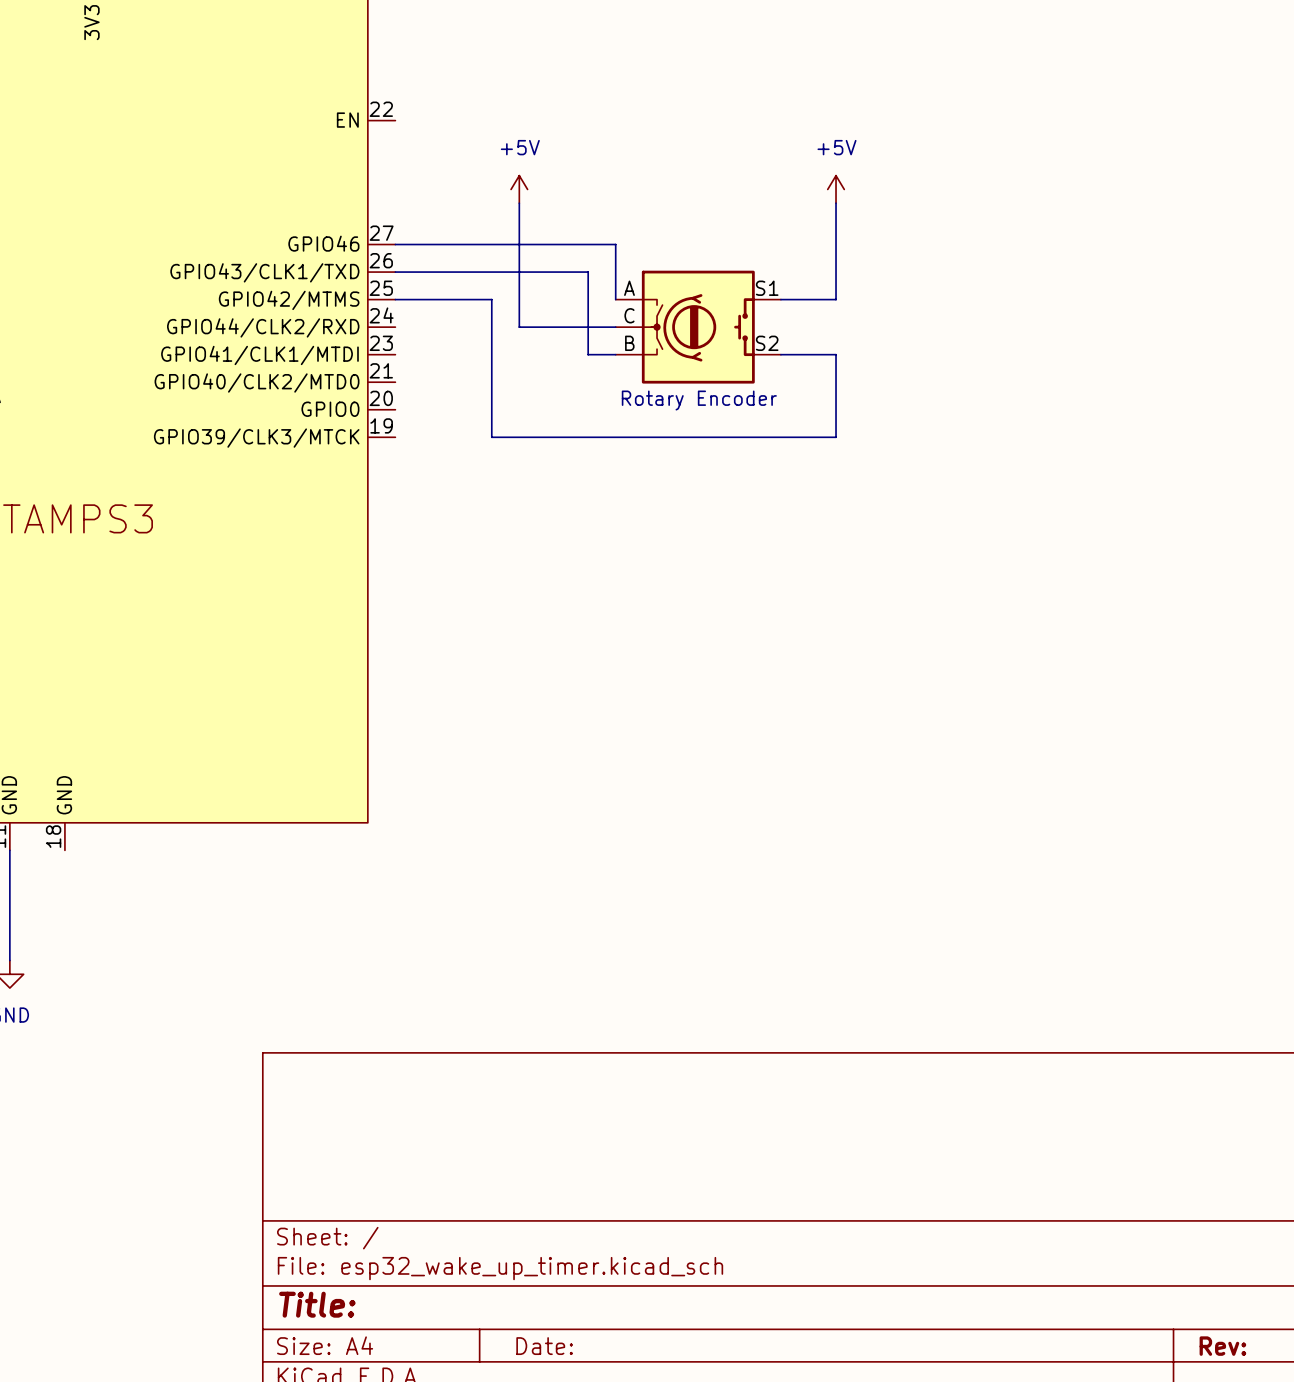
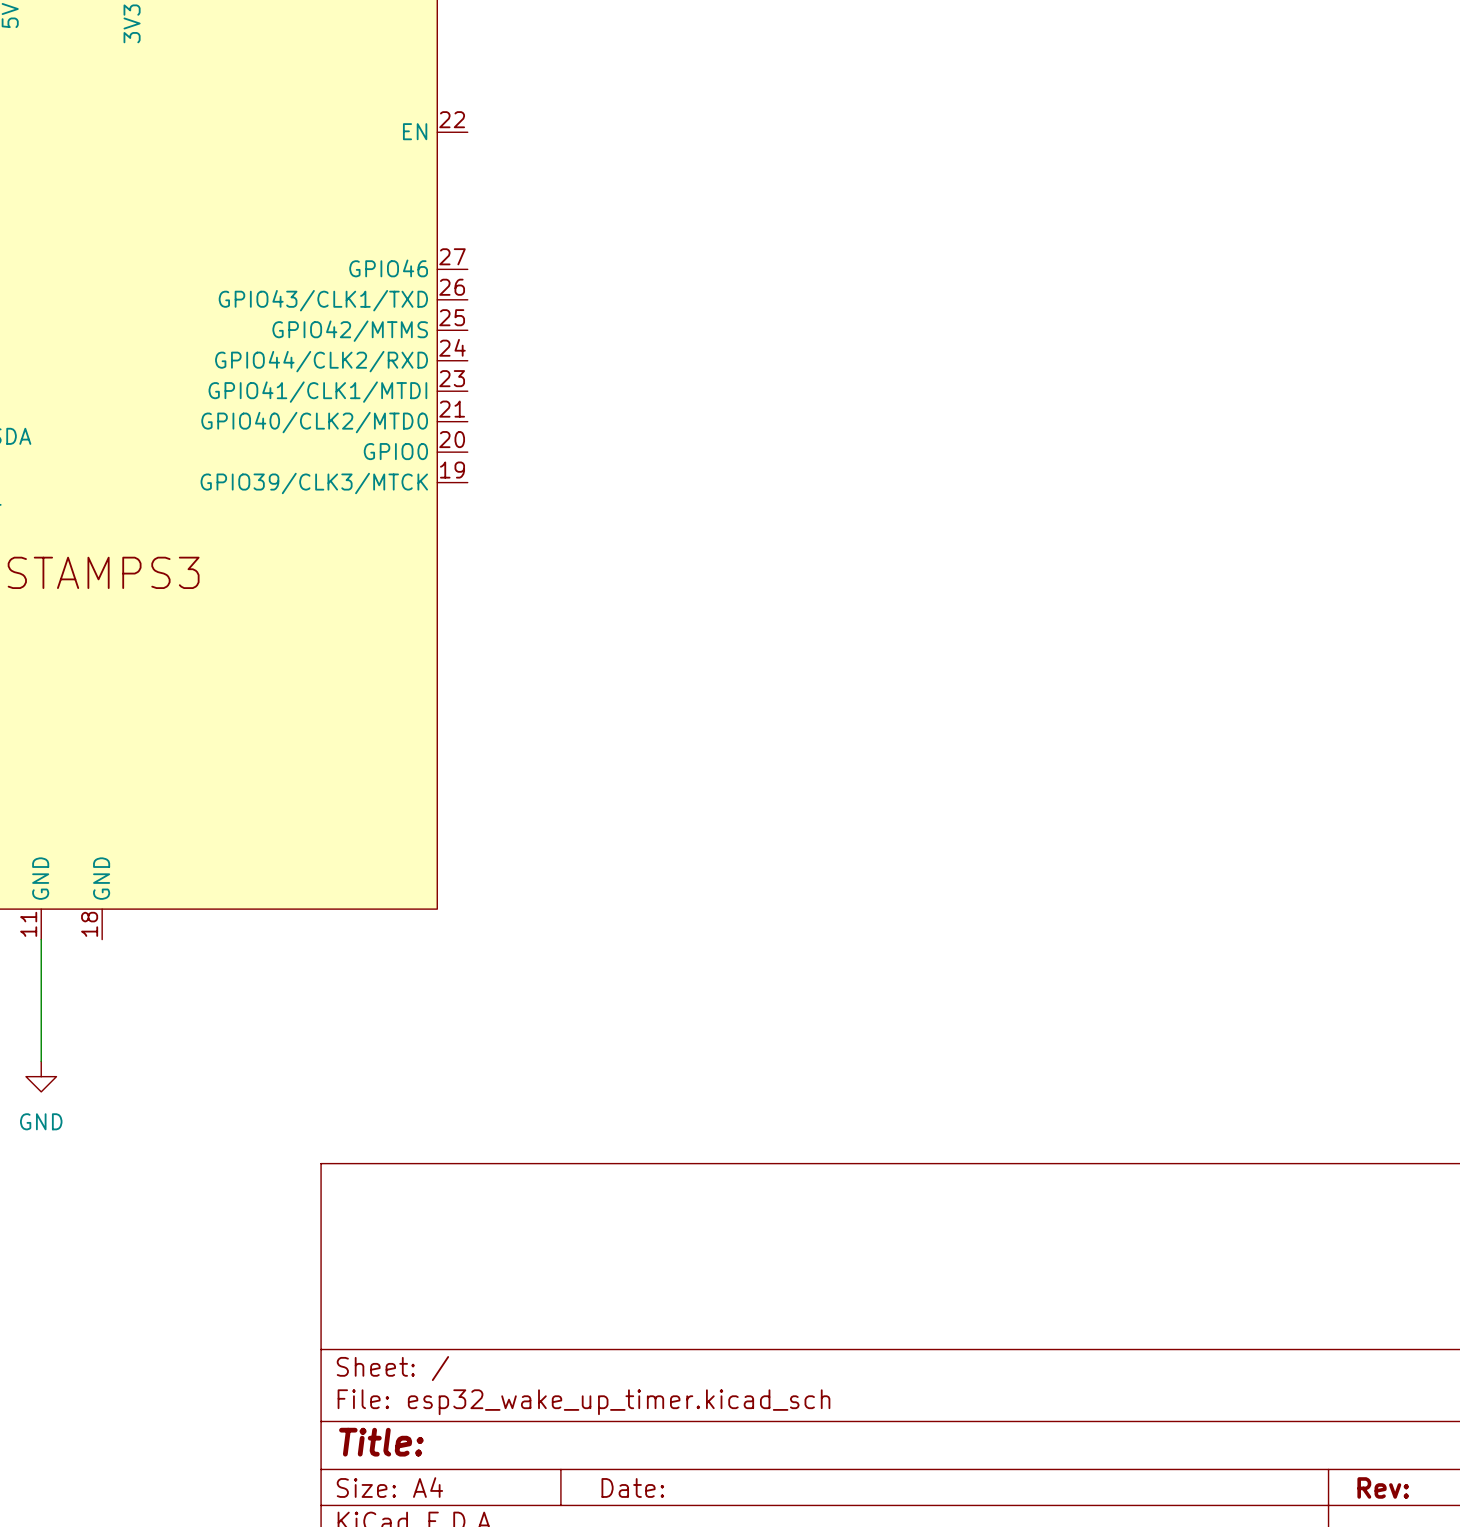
power symbol: +5V (519, 189) -> none
power symbol: +5V (836, 189) -> none
wire: (519, 203) (519, 327) (615, 327) -> none
wire: (836, 203) (836, 299) (780, 299) -> none
wire: (395, 244) (615, 244) (615, 299) -> none
wire: (395, 272) (588, 272) (588, 354) (615, 354) -> none
wire: (395, 299) (491, 299) (491, 437) (836, 437) (836, 354) (780, 354) -> none
part: Rotary Encoder (698, 327) -> none

